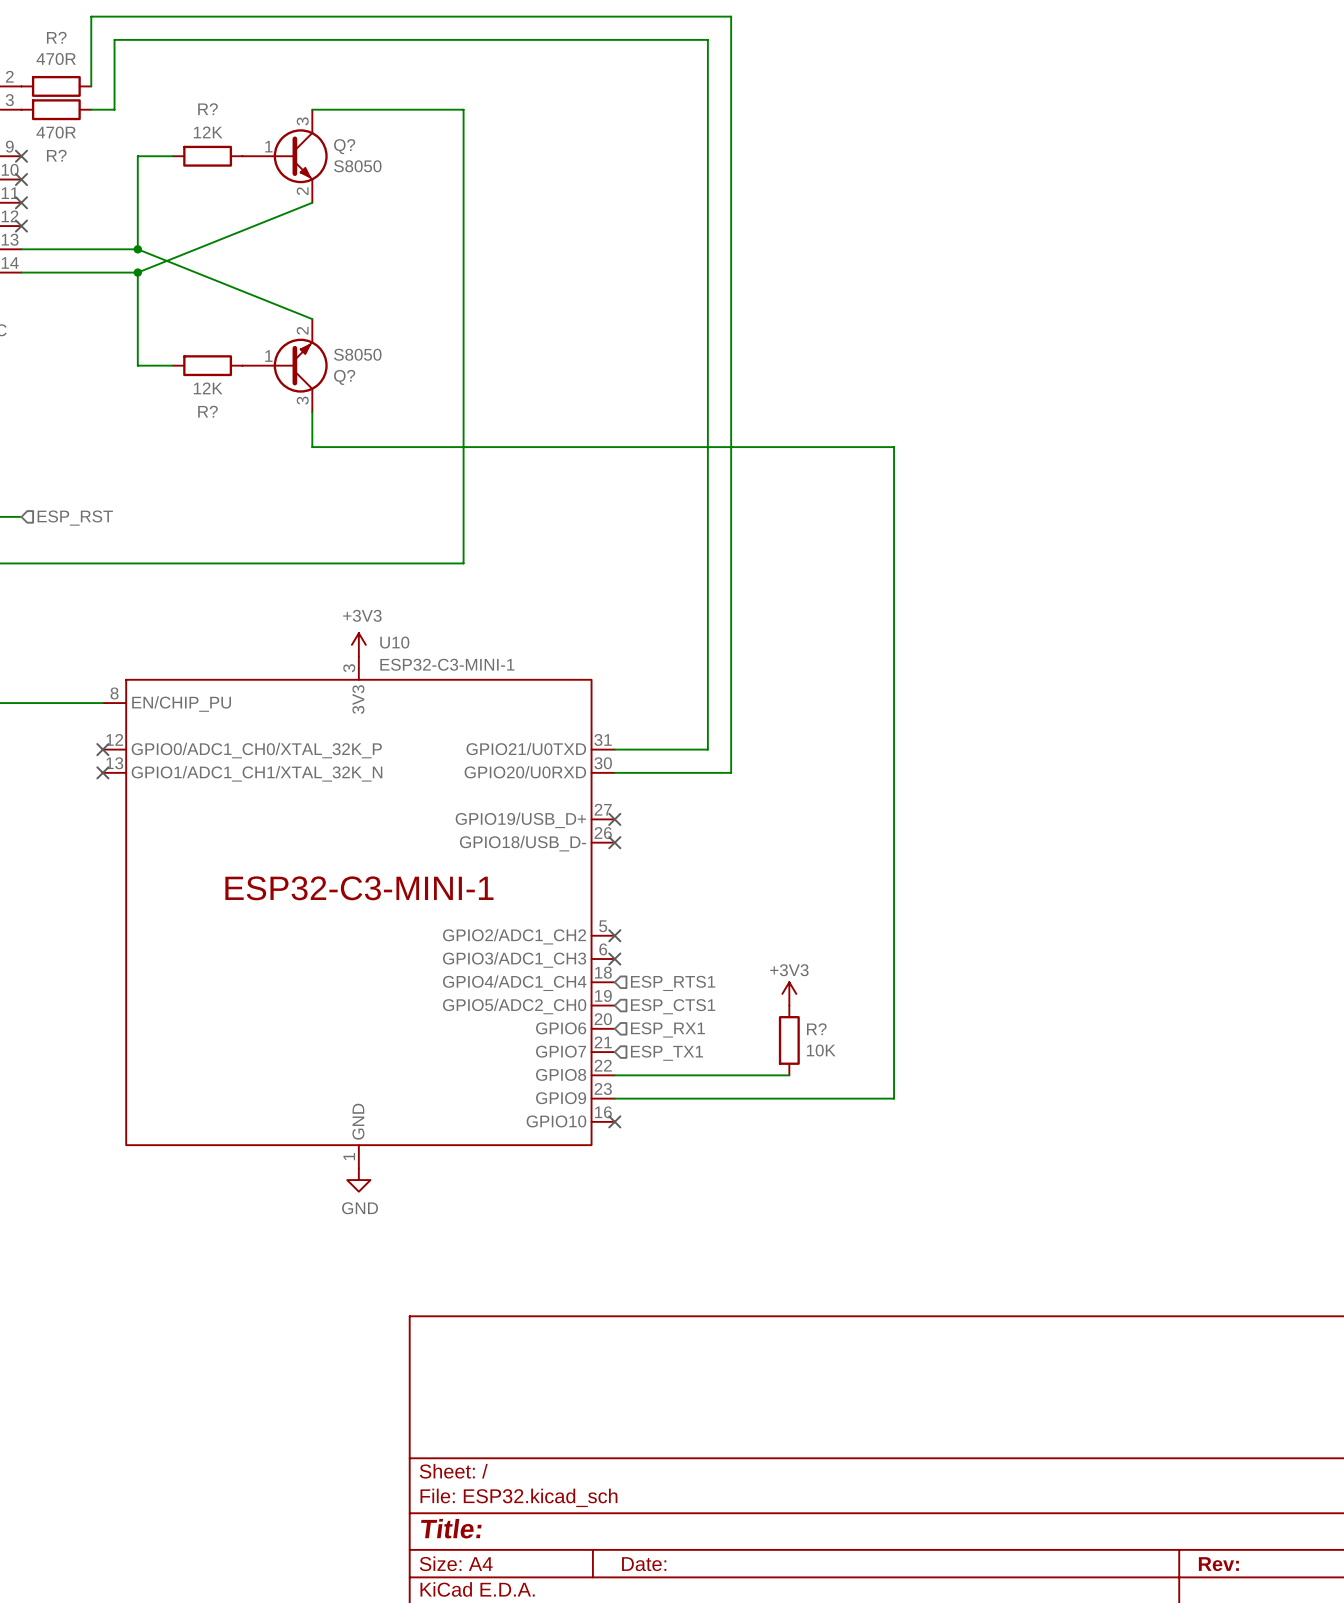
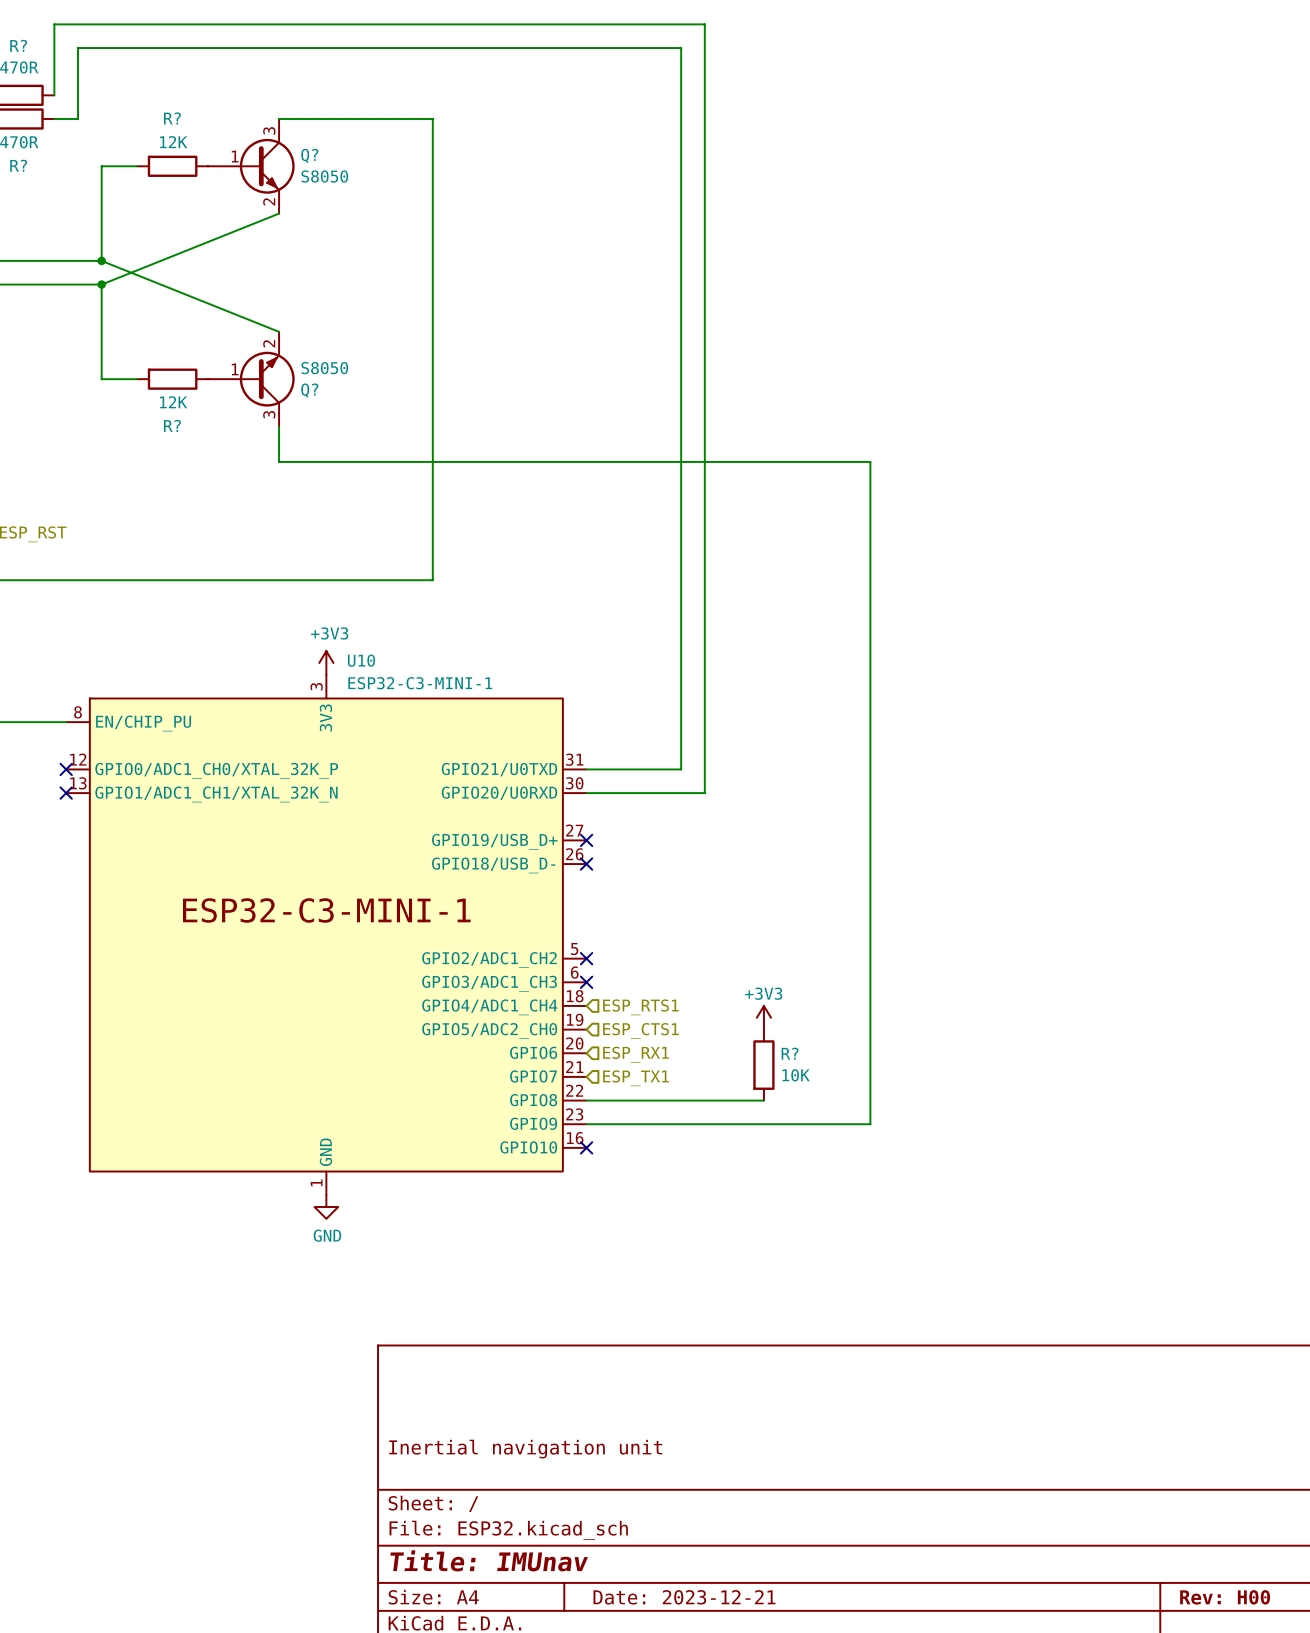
title block: none -> Inertial navigation unit (525, 1449)
title block: Title: (451, 1528) -> Title: IMUnav (489, 1560)
title block: Date: (644, 1564) -> Date: 2023-12-21 (684, 1597)
title block: Rev: (1218, 1564) -> Rev: H00 (1225, 1597)

